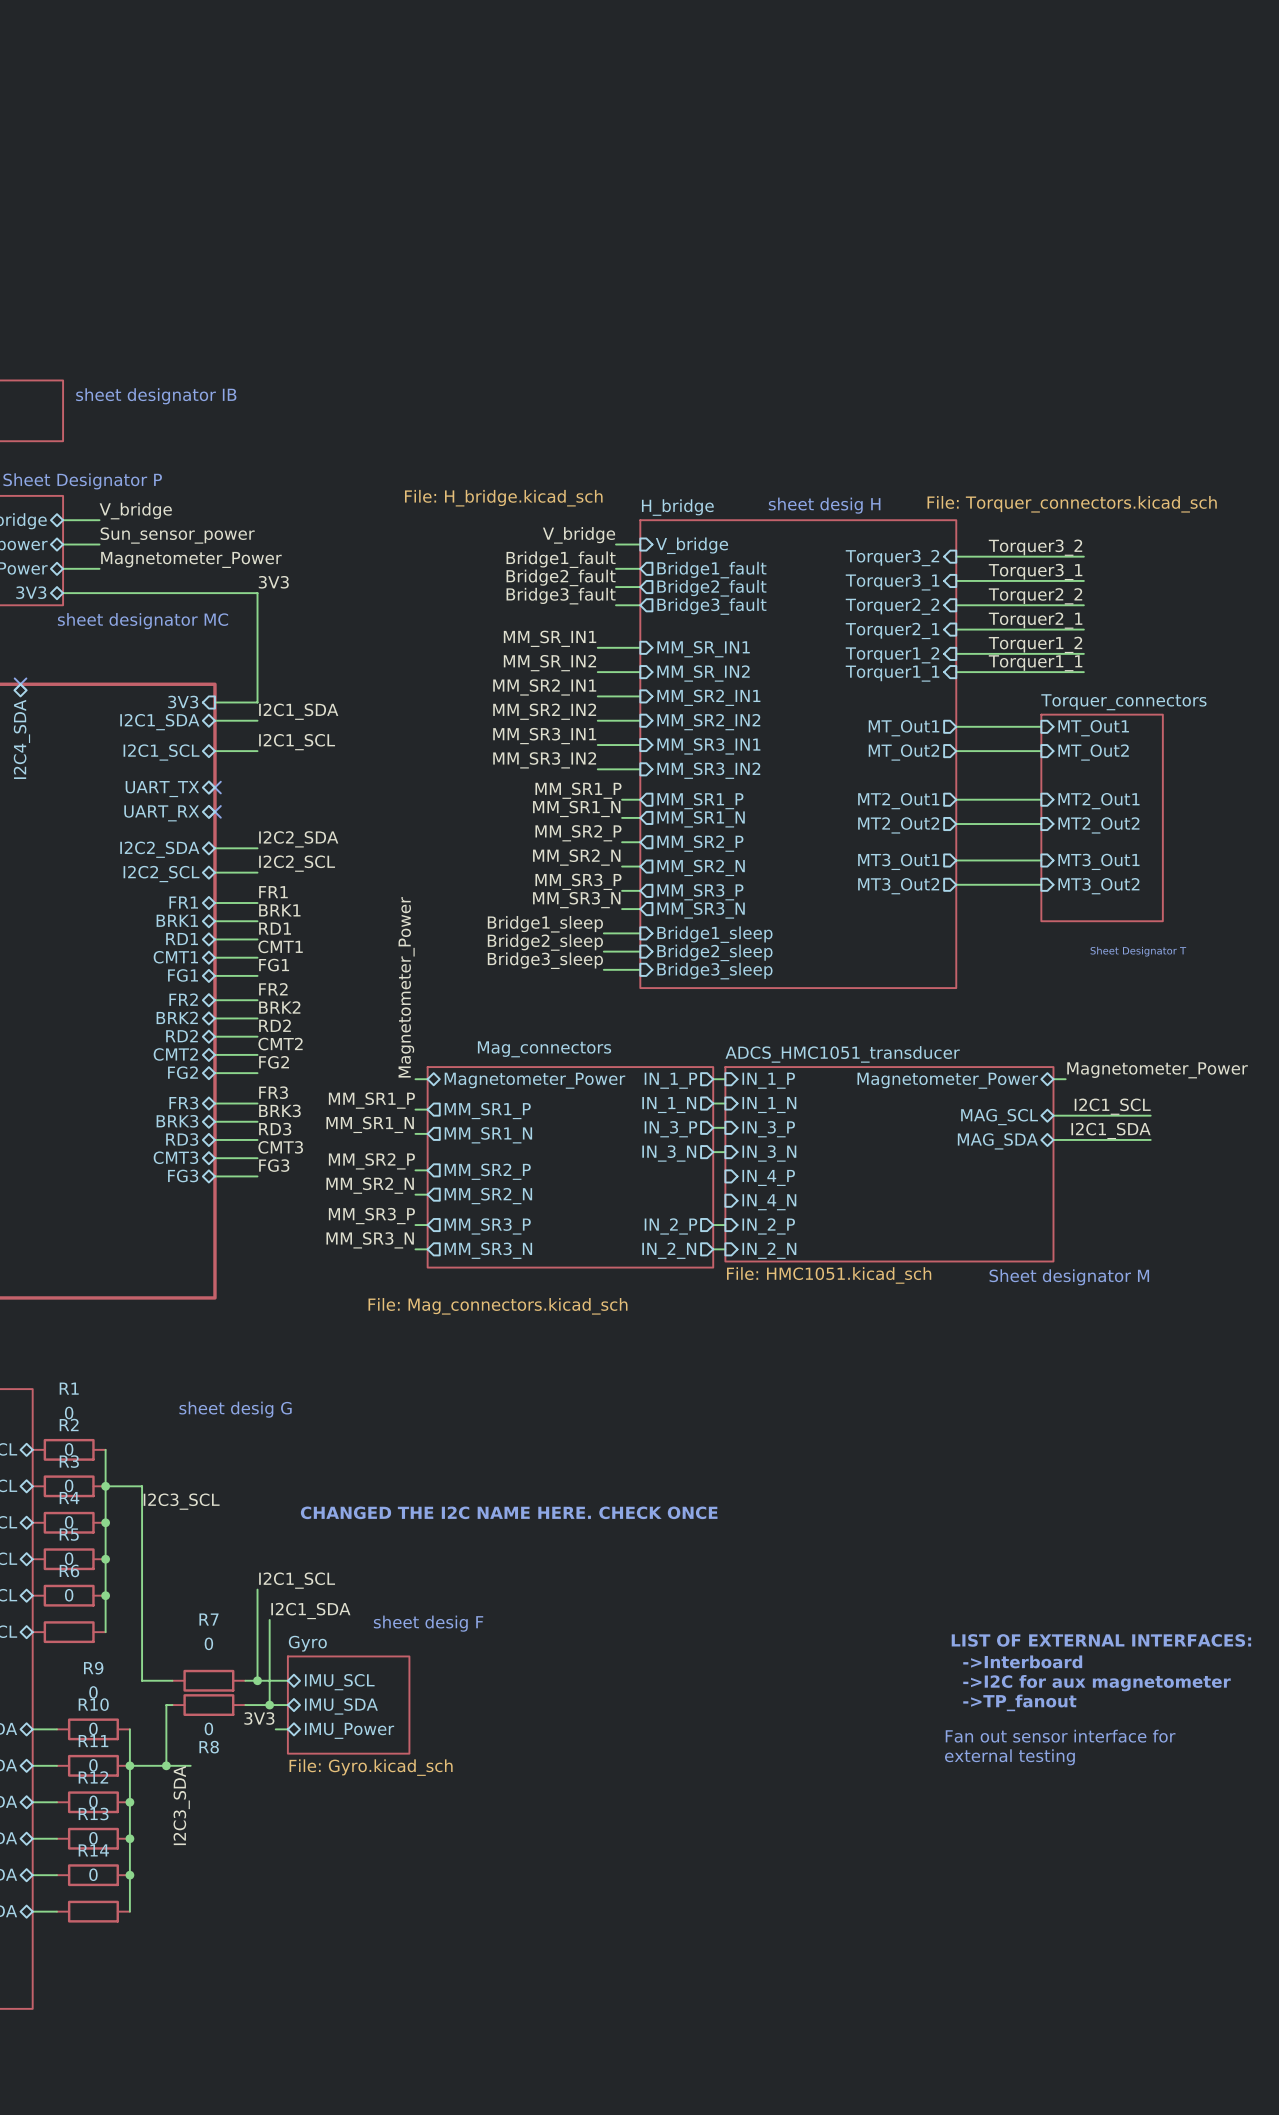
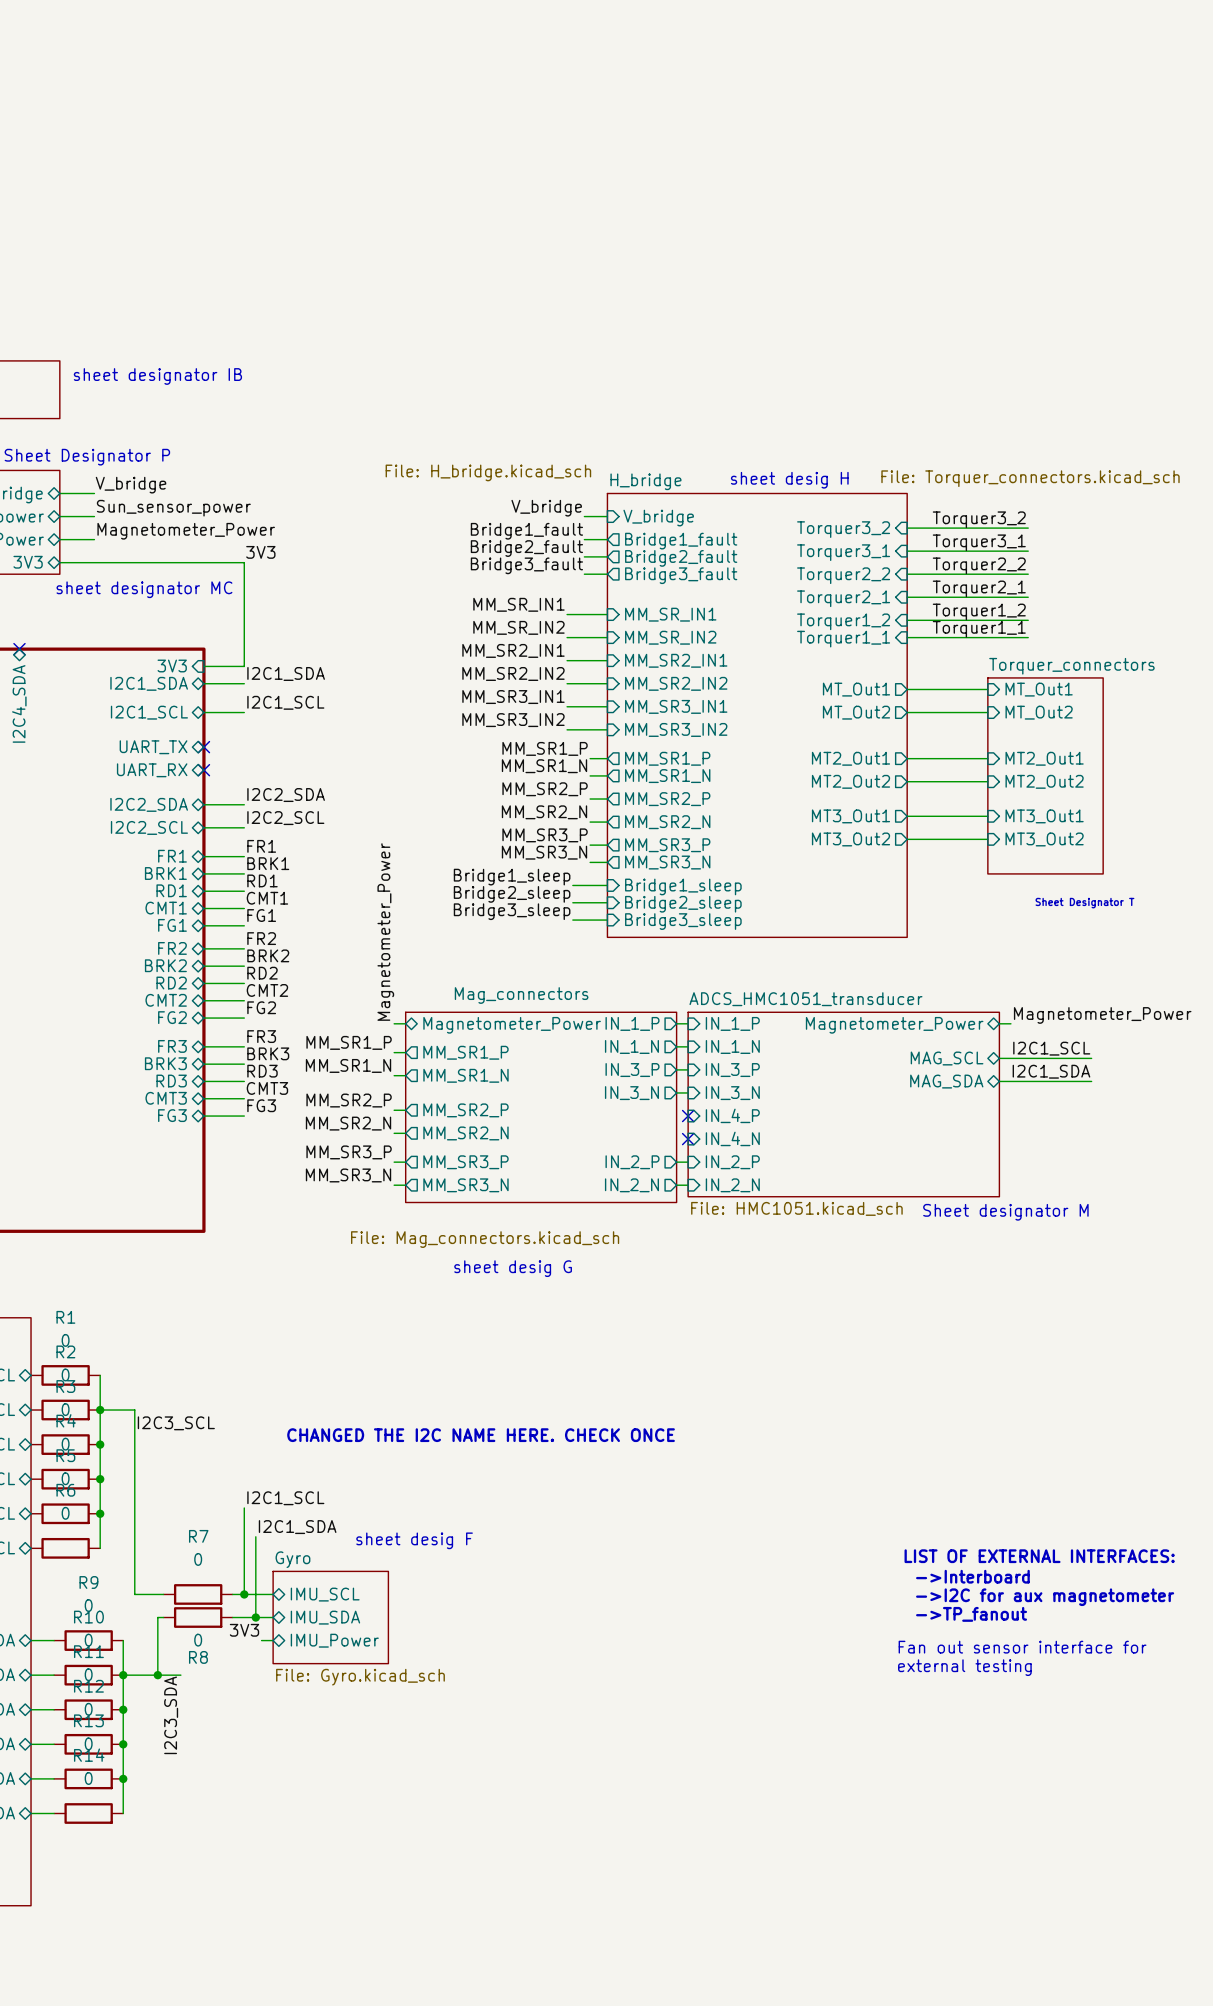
no-connect mark: none -> (688, 1116)
no-connect mark: none -> (688, 1139)
text: none -> sheet desig G (513, 1268)
text: sheet desig G (235, 1409) -> none

